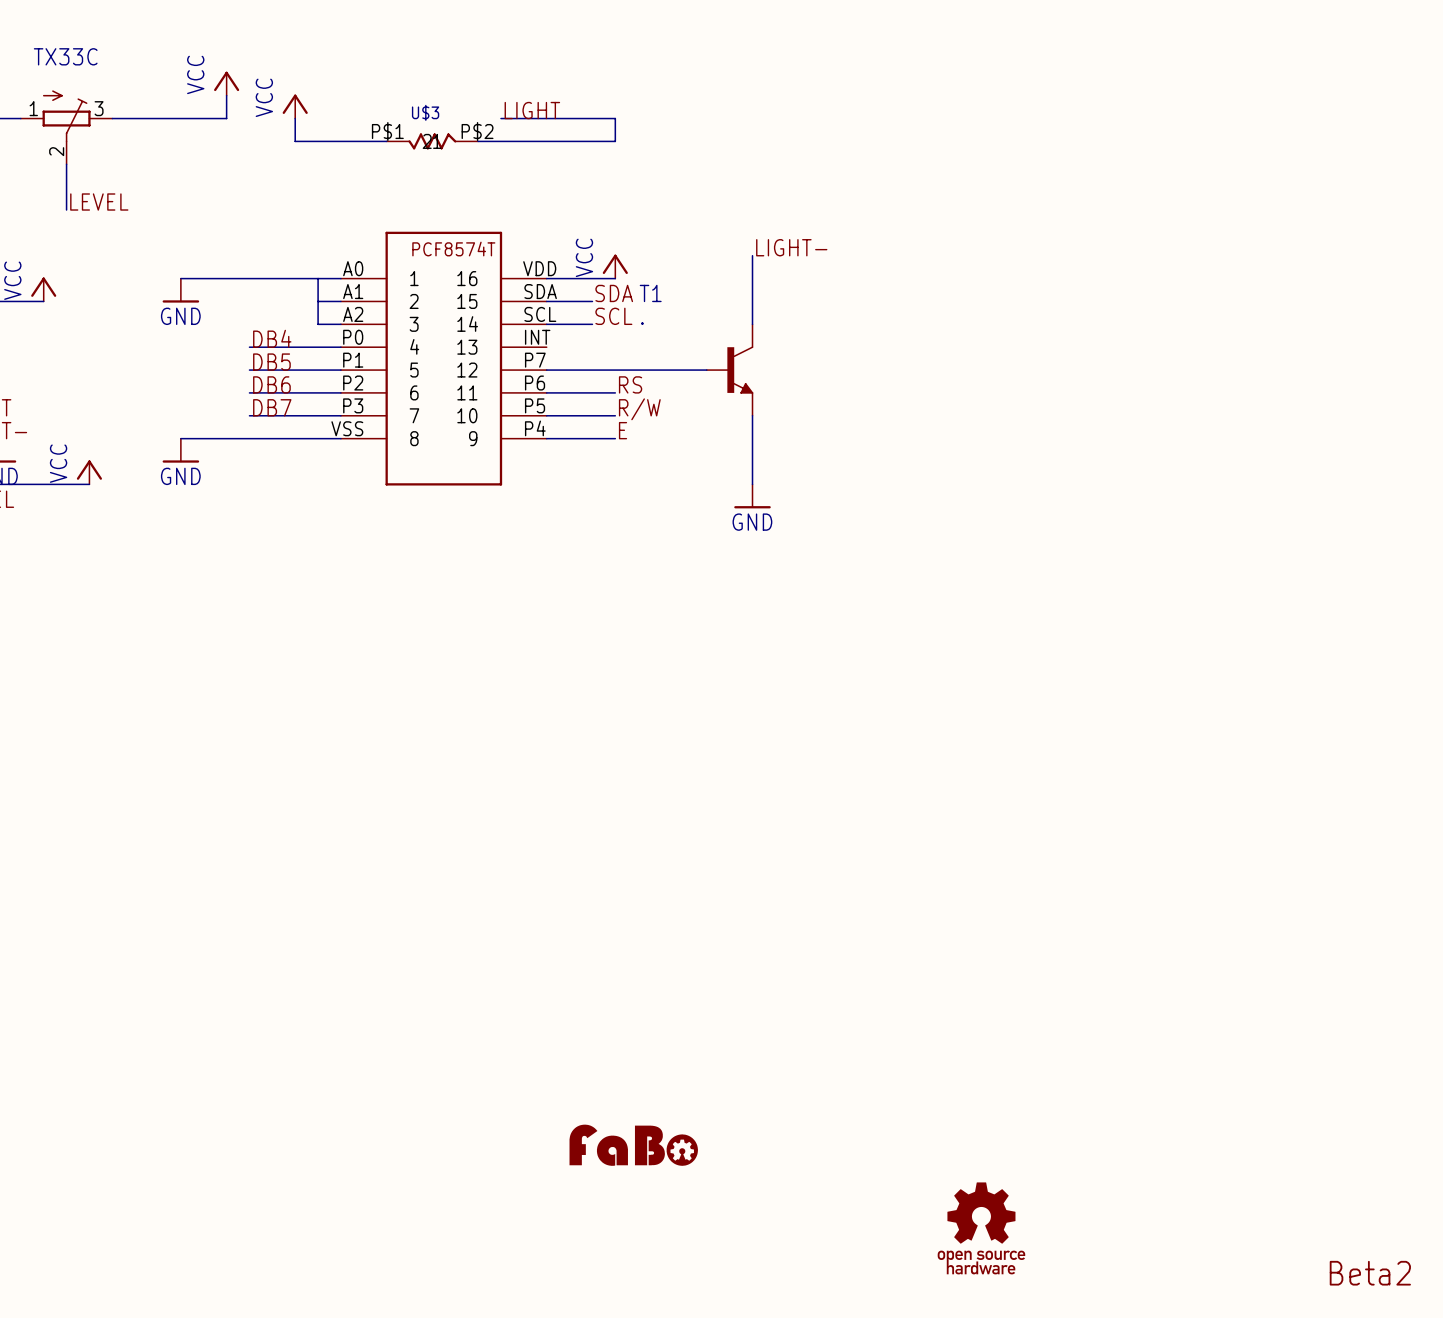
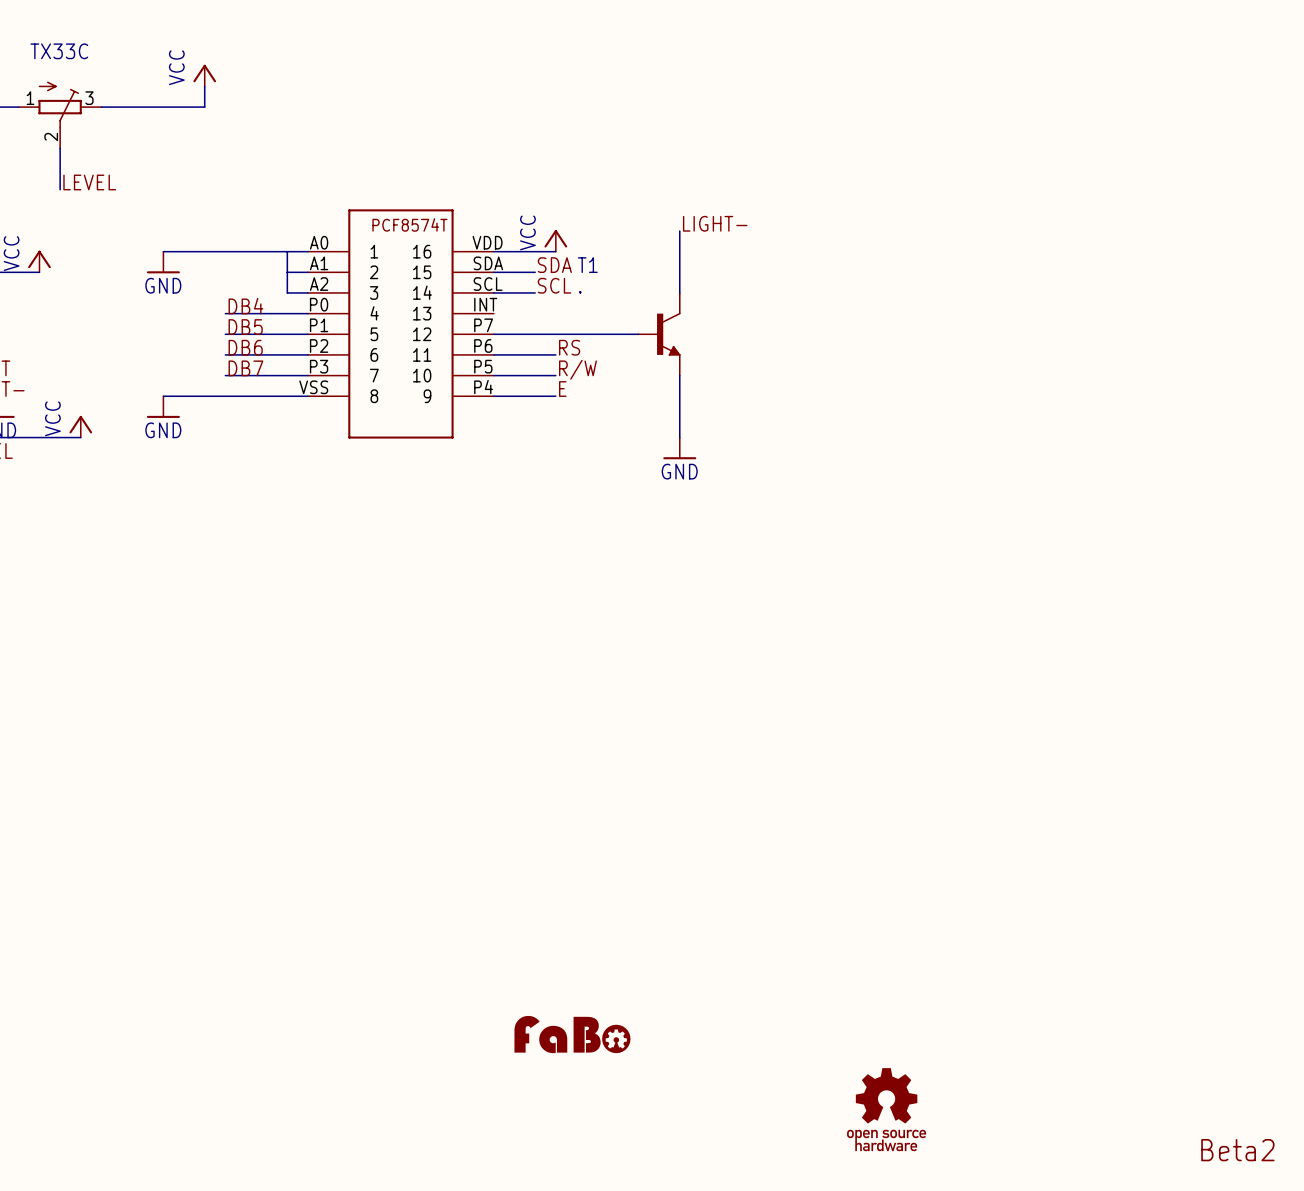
power symbol: VCC (295, 106) -> none
label: LIGHT (532, 110) -> none
wire: (295, 118) (295, 141) (386, 141) -> none
wire: (500, 118) (615, 118) (615, 141) (478, 141) -> none
U$3: (432, 141) -> none

